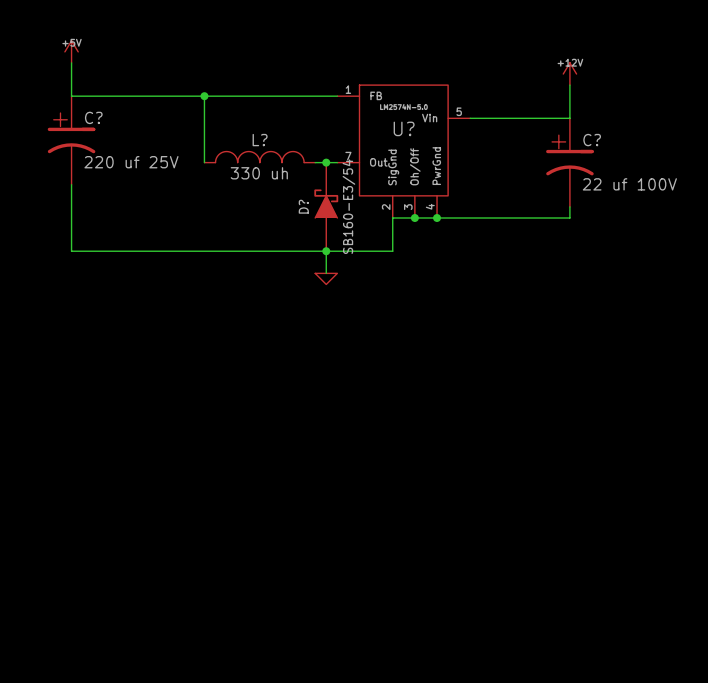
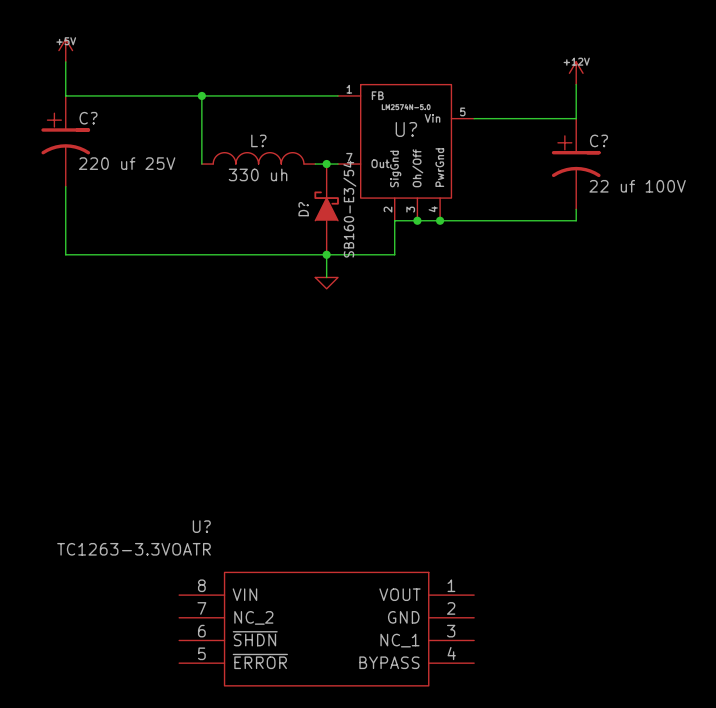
U?: none -> TC1263-3.3VOATR (326, 629)

